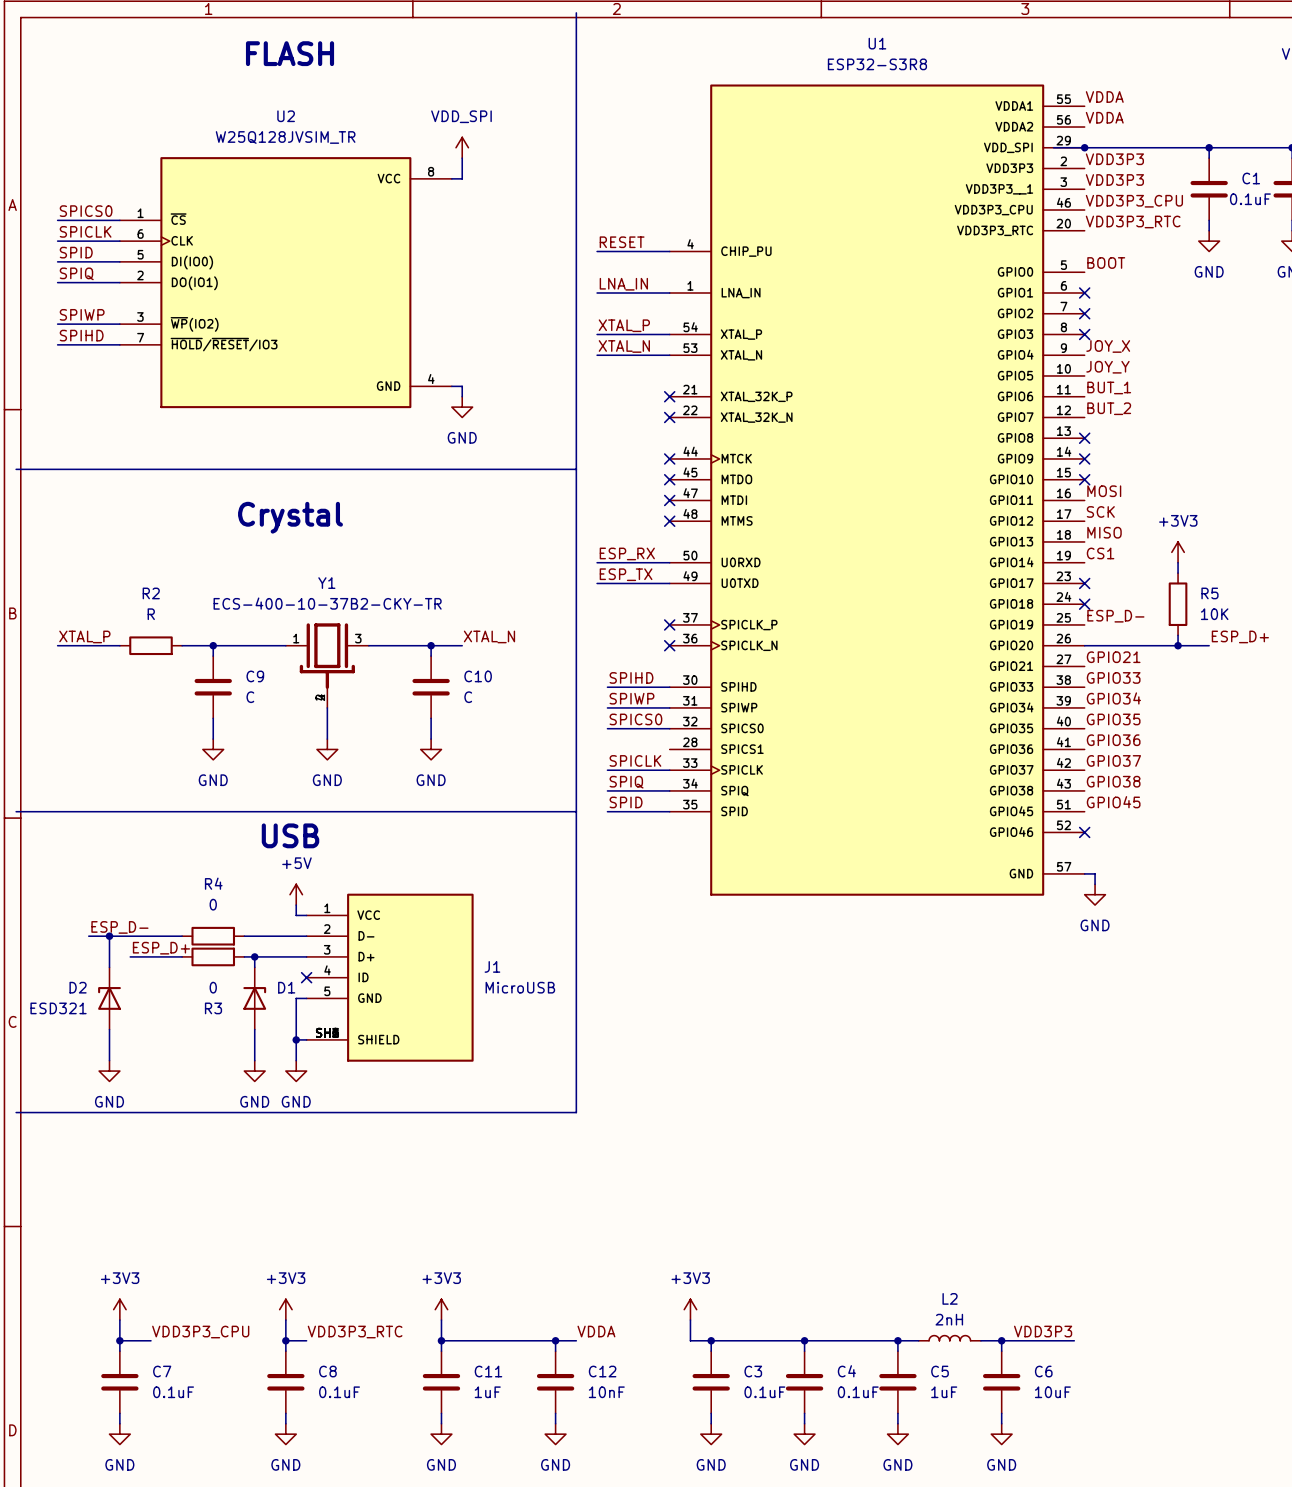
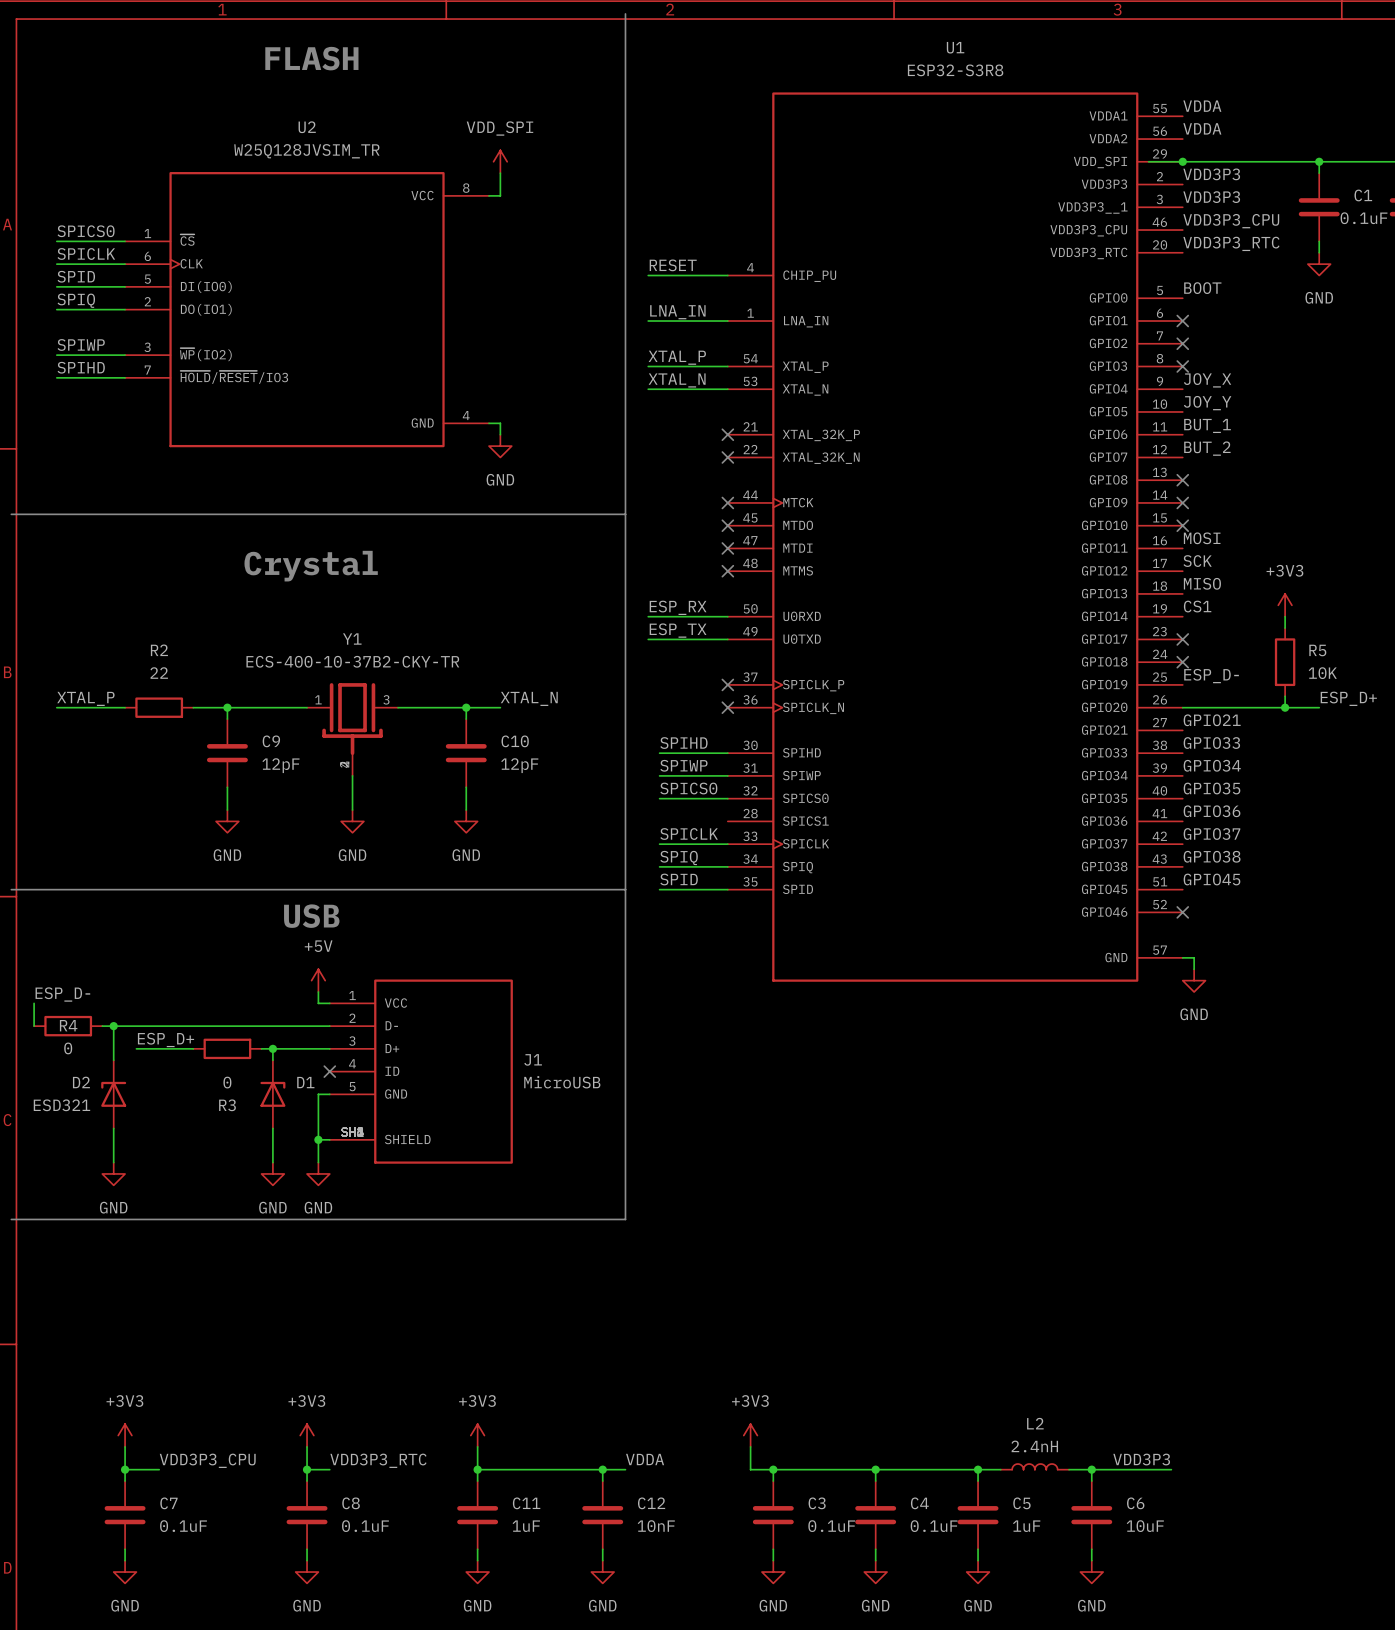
R2 value: R (151, 614) -> 22 (159, 673)
C9 value: C (250, 697) -> 12pF (280, 765)
C10 value: C (468, 697) -> 12pF (519, 765)
R4 name position: R4 (213, 883) -> R4 (68, 1025)
R4 value position: 0 (213, 904) -> 0 (68, 1048)
wire: none -> (34, 1003) (34, 1026)
label position: ESP_D- (119, 927) -> ESP_D- (62, 994)
wire: none -> (193, 1026) (261, 1026)
R4 position: (213, 936) -> (68, 1026)
L2 value: 2nH (949, 1319) -> 2.4nH (1034, 1446)

